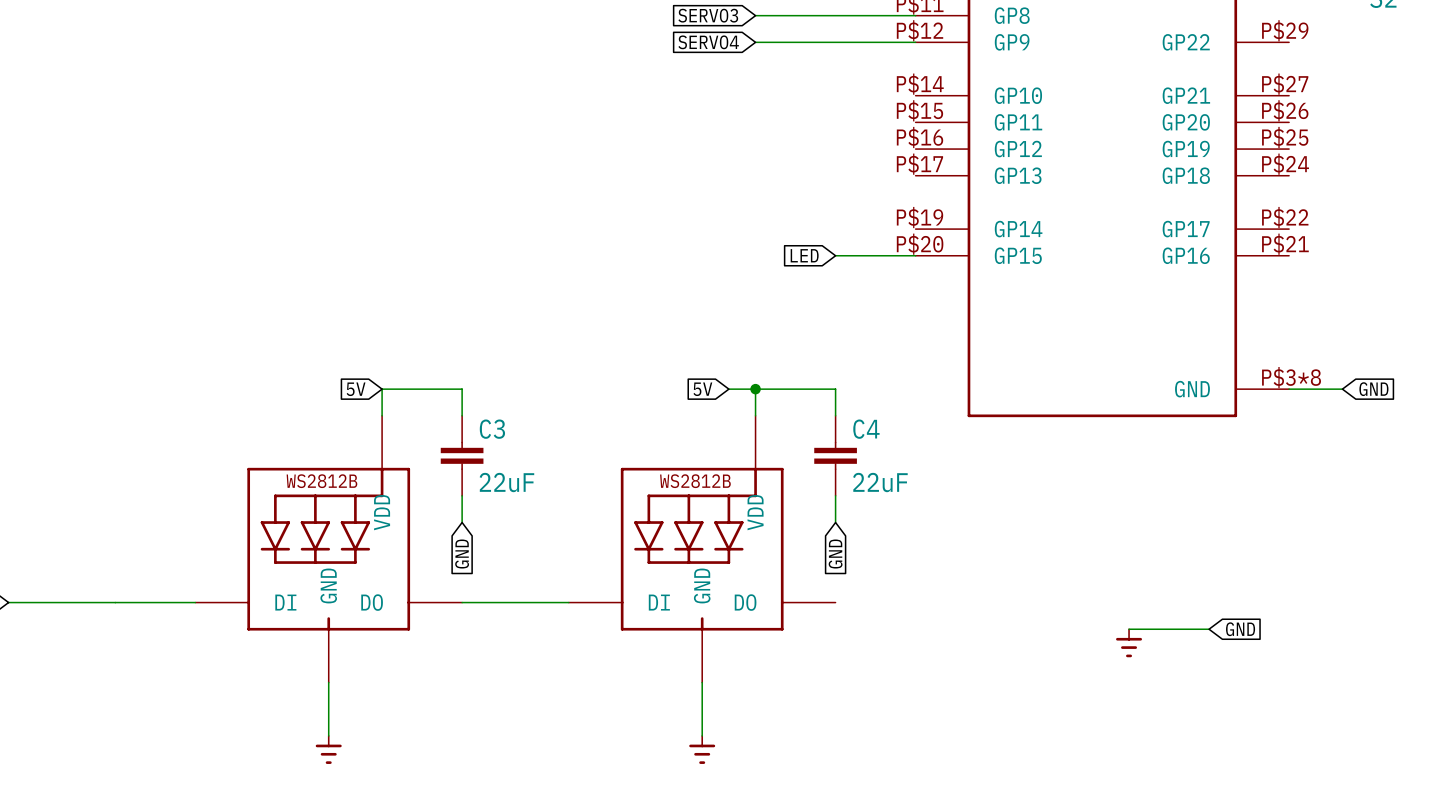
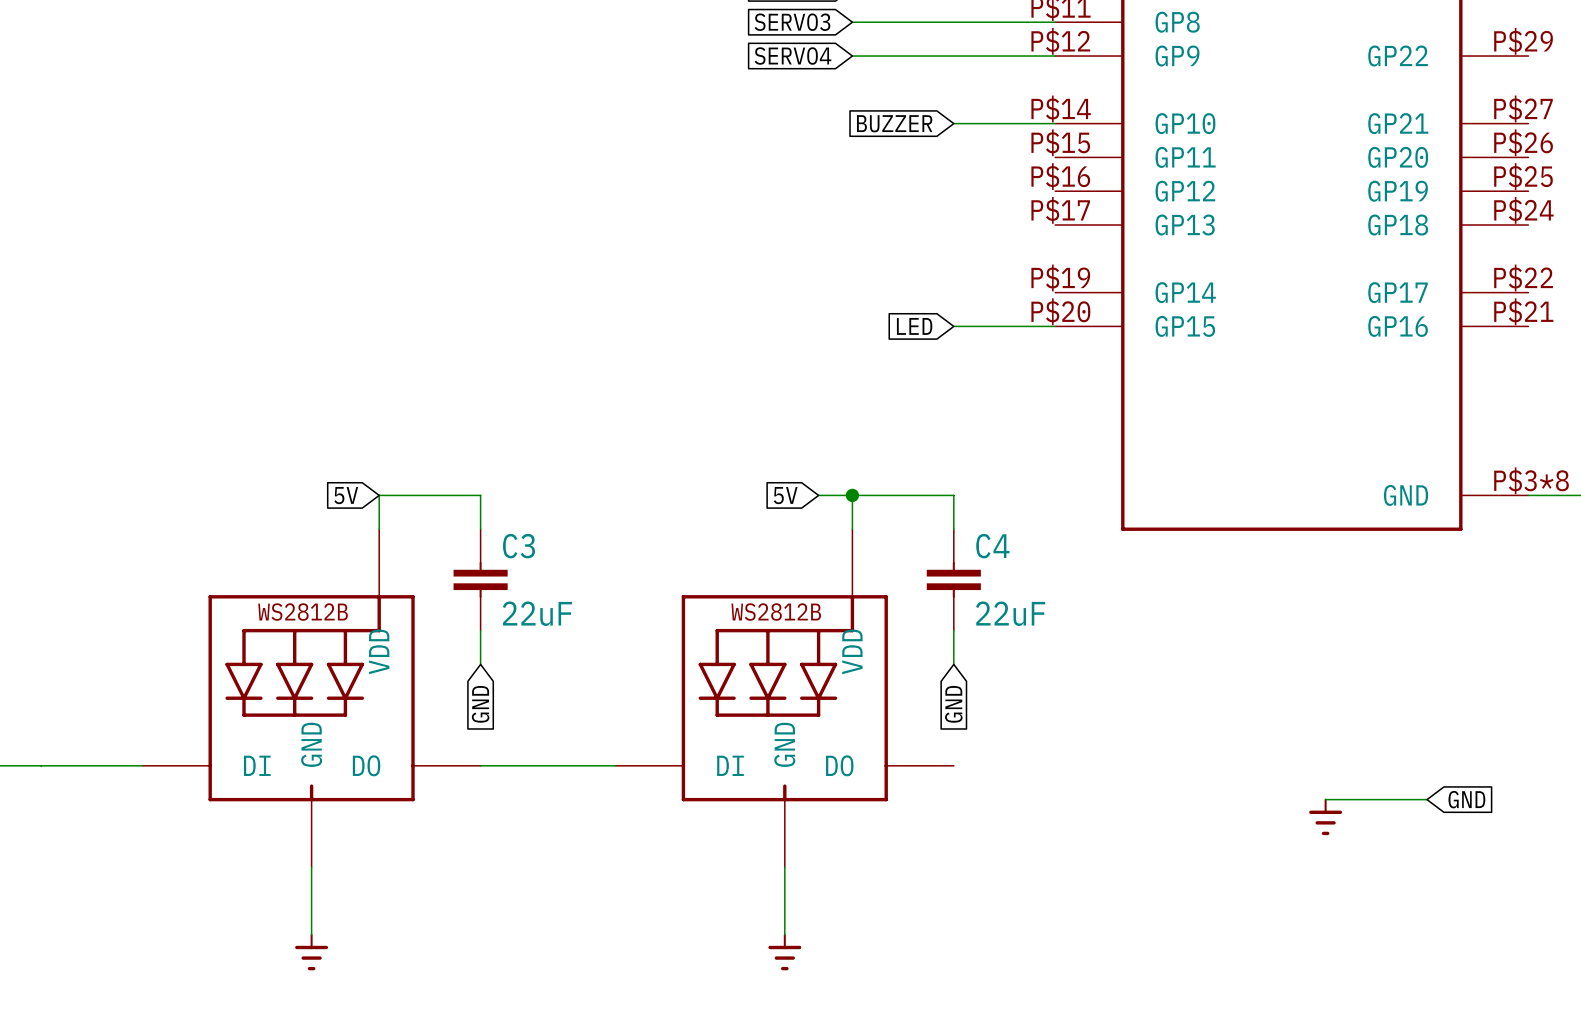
global label: none -> BUZZER (894, 123)
wire: none -> (953, 123) (1055, 123)

